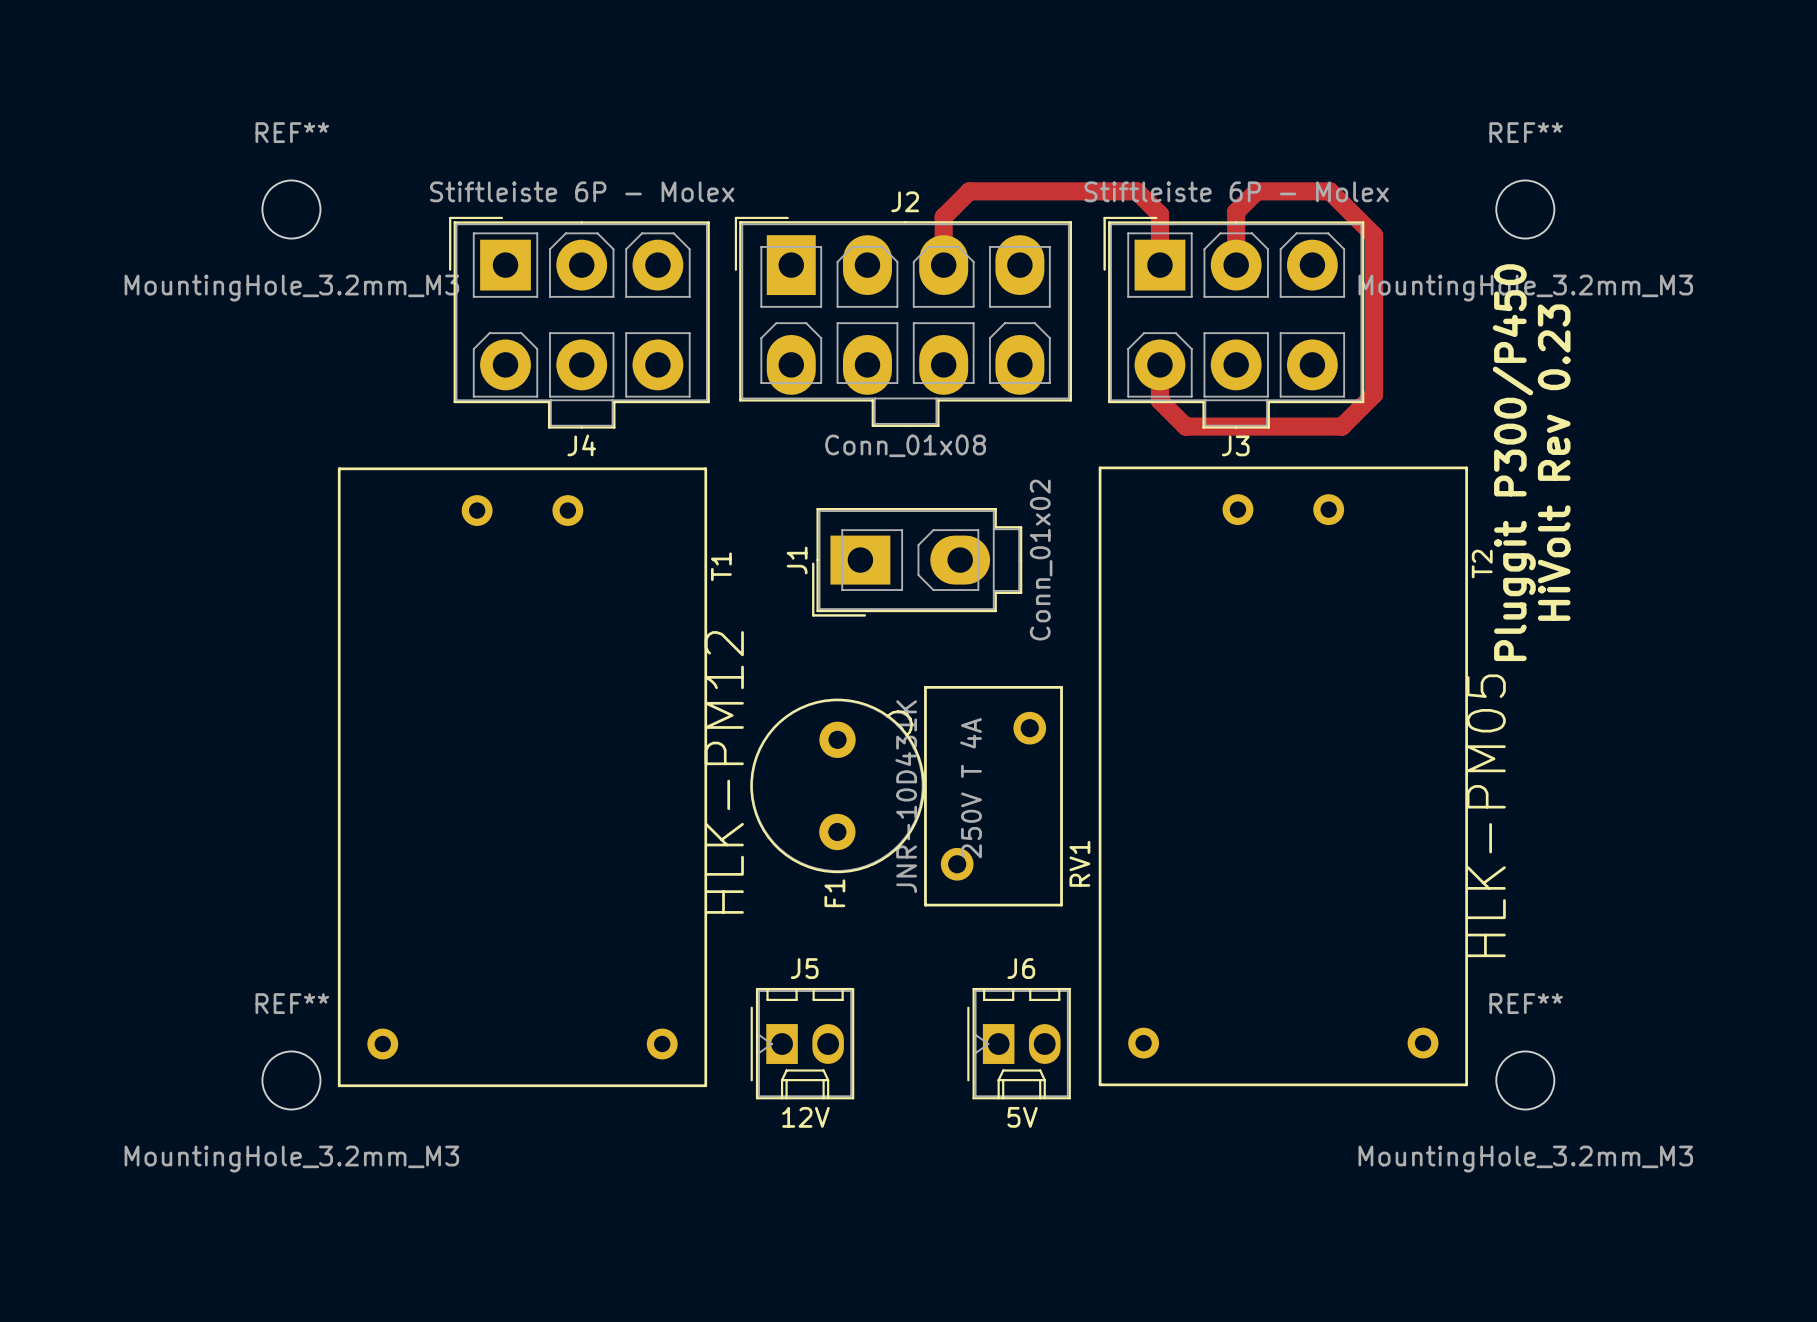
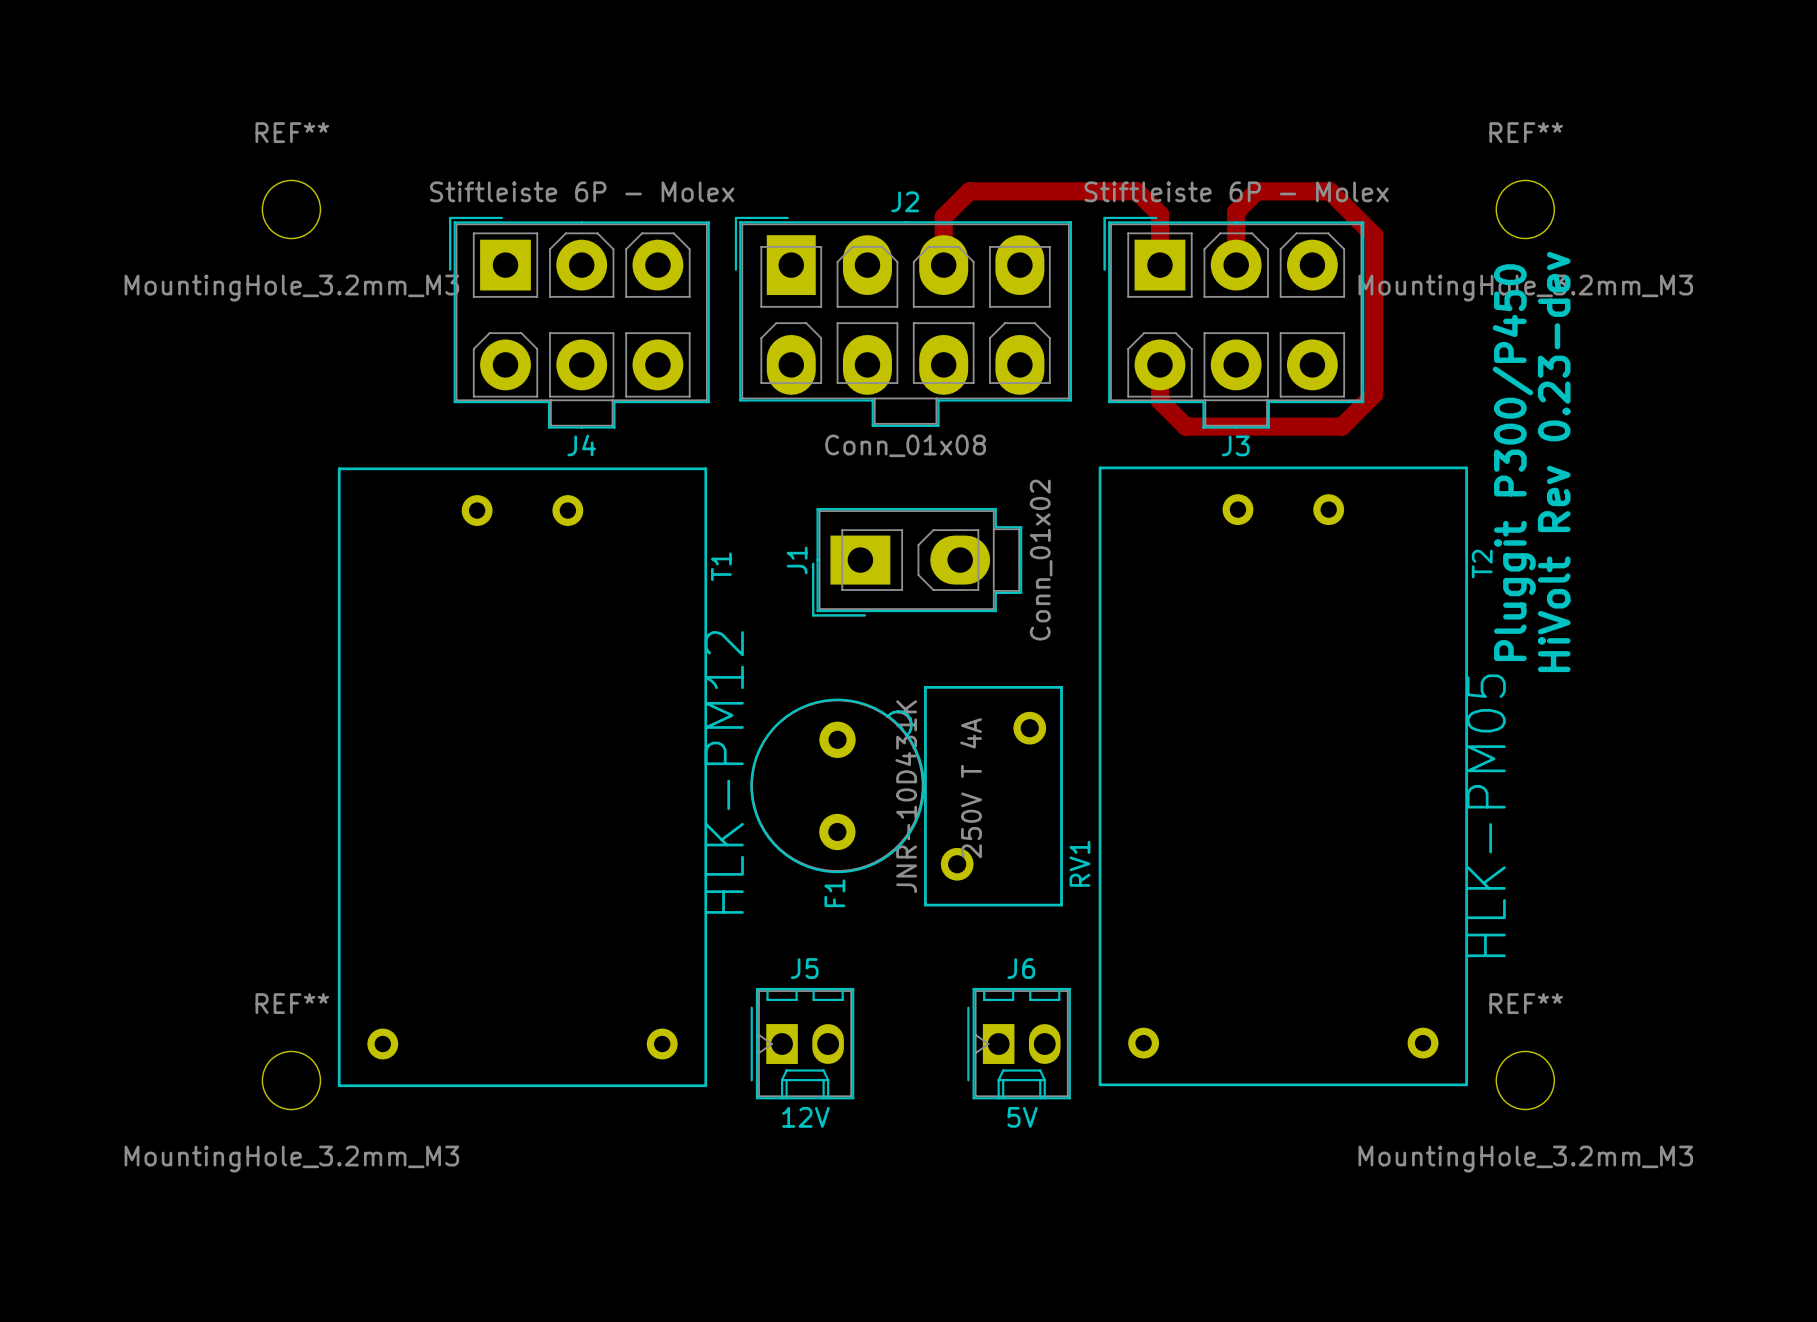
text: HiVolt Rev 0.23 (1554, 462) -> HiVolt Rev 0.23-dev (1554, 461)

